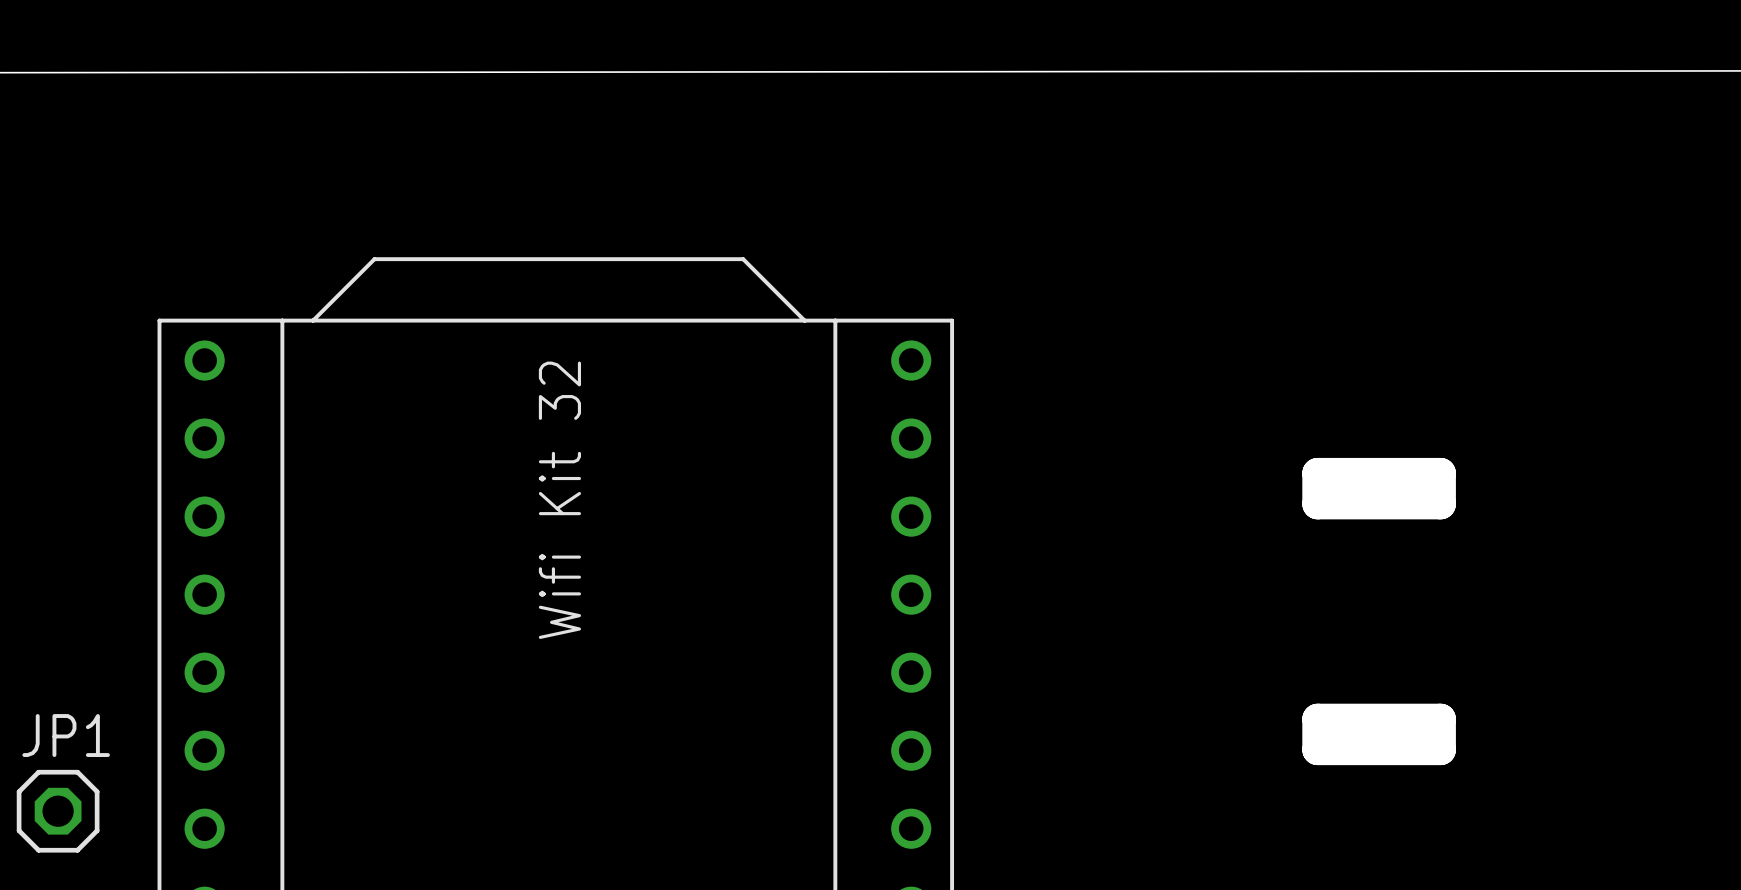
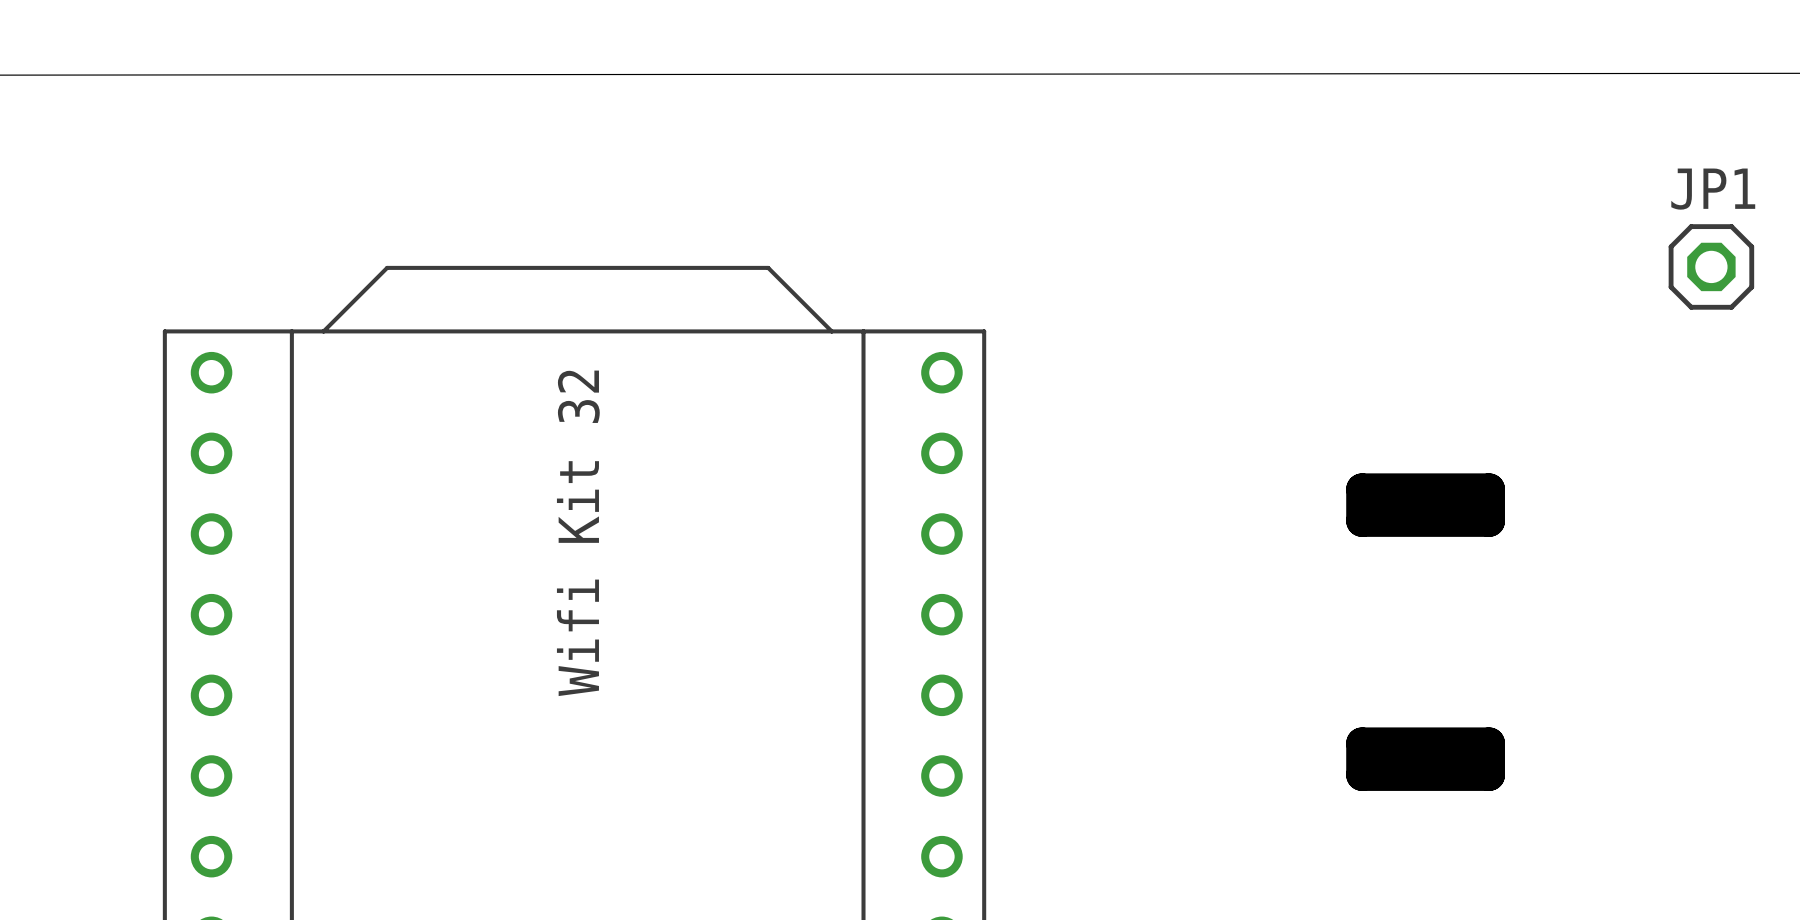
JP1 position: (58, 811) -> (1711, 266)

